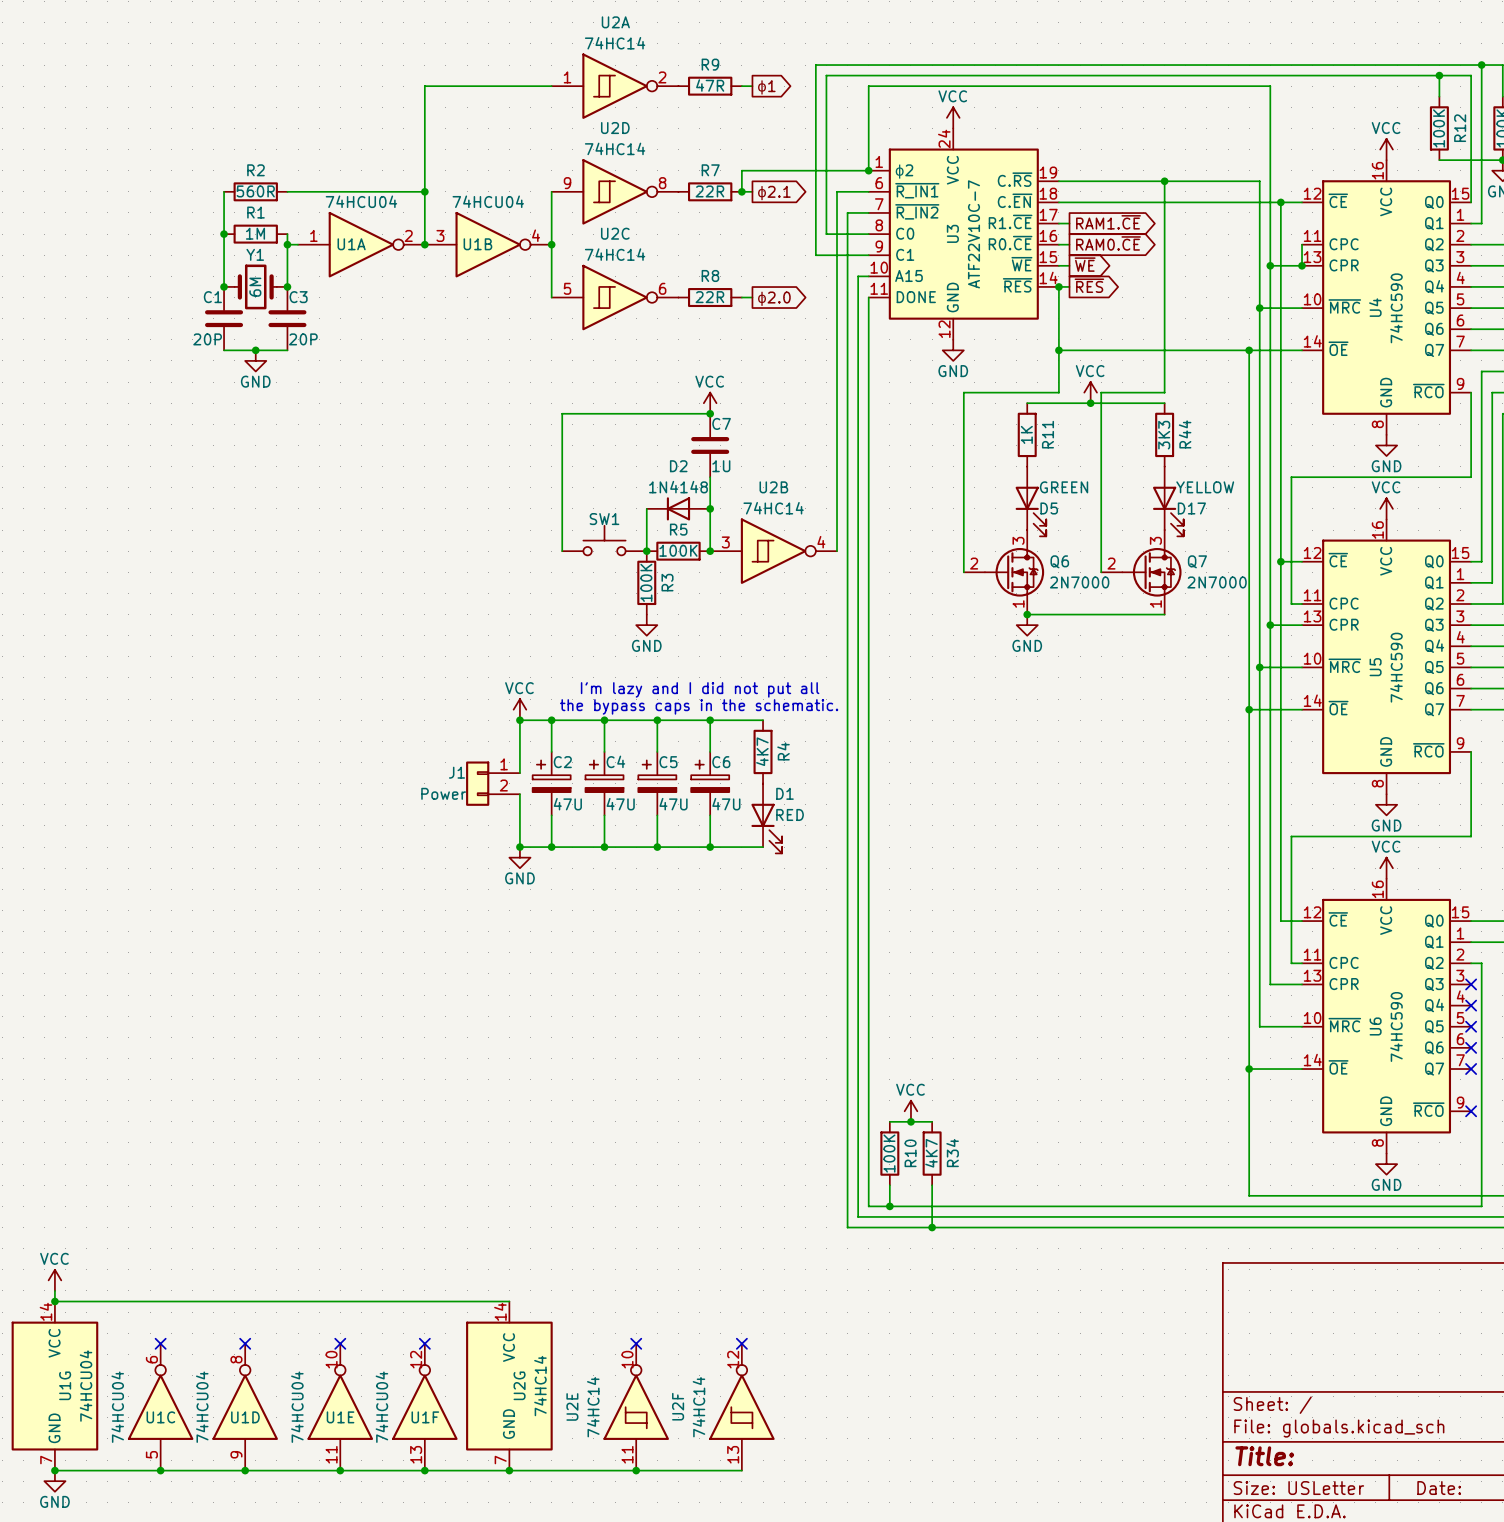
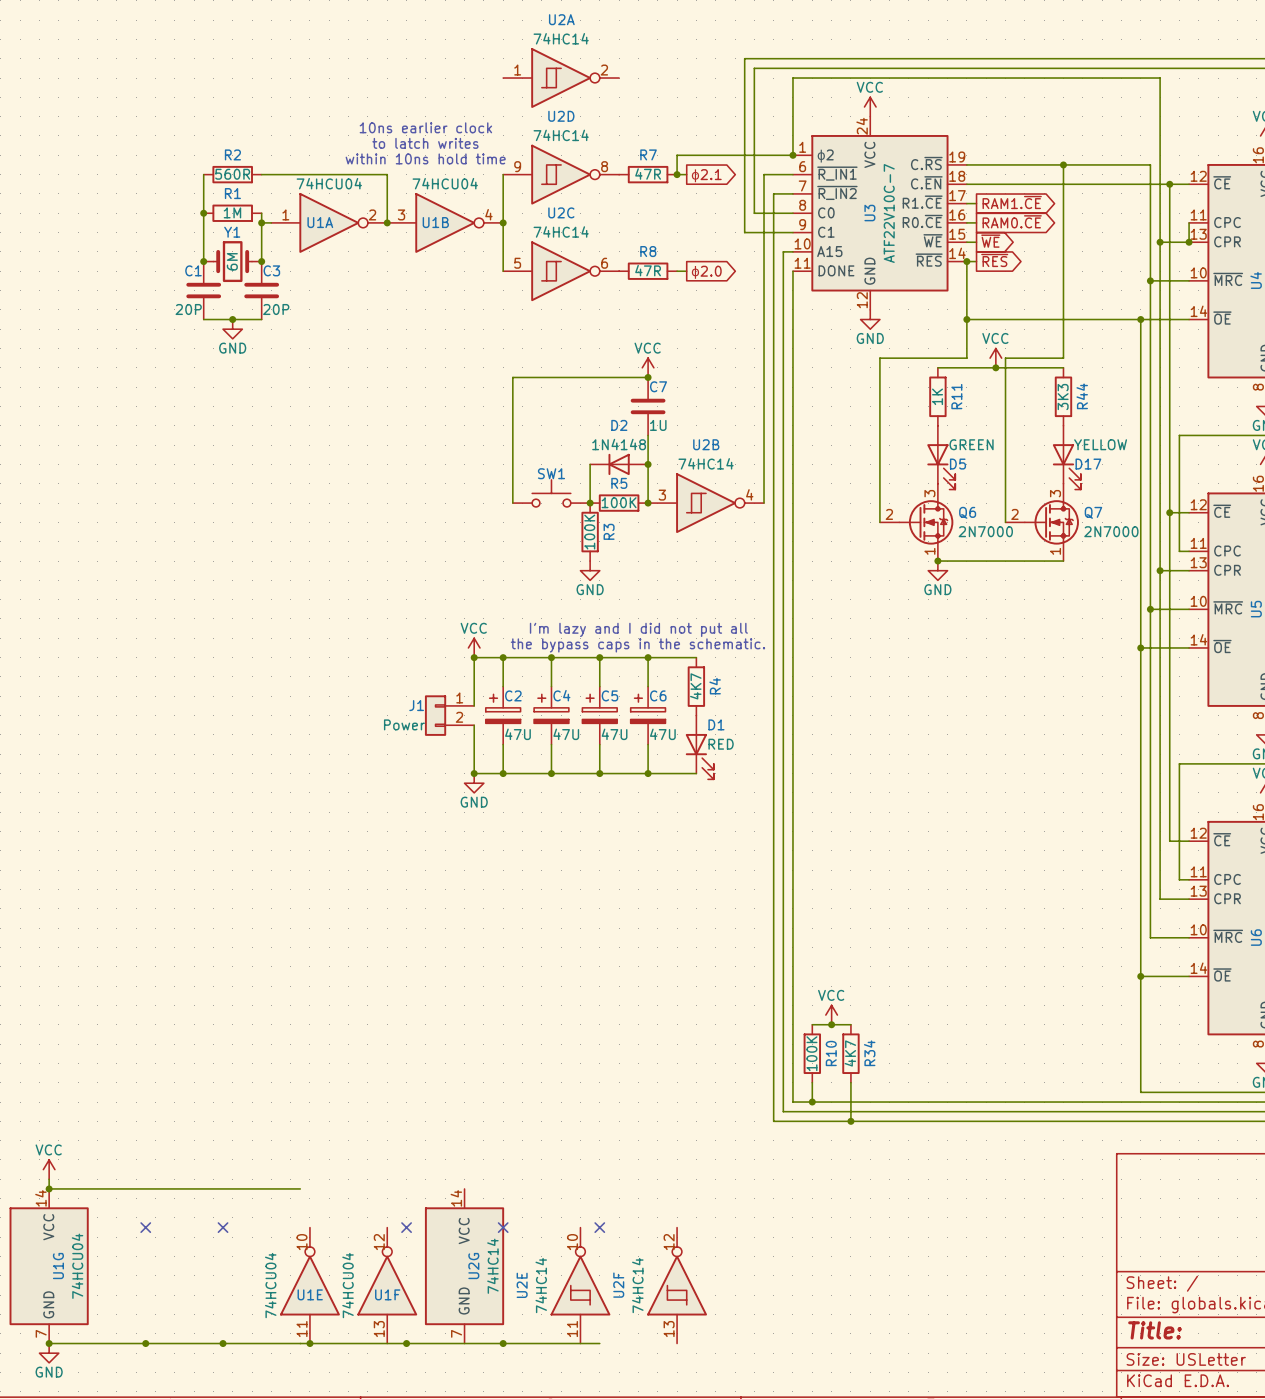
wire: (551, 86) (424, 86) (424, 191) -> none
R9: 47R (710, 86) -> none
wire: (741, 86) (752, 86) -> none
global label: ϕ1 (766, 87) -> none
text: none -> 10ns earlier clock (425, 127)
text: none -> to latch writes (425, 143)
text: none -> within 10ns hold time (425, 158)
junction: (424, 191) -> none
R7 value: 22R (709, 191) -> 47R (648, 174)
R8 value: 22R (709, 297) -> 47R (648, 270)
wire: (329, 1301) (509, 1301) -> none
no-connect mark: (340, 1343) -> none
no-connect mark position: (424, 1343) -> (406, 1227)
no-connect mark: none -> (503, 1227)
no-connect mark position: (636, 1343) -> (599, 1227)
no-connect mark: (741, 1343) -> none
U1C: 74HCU04 (160, 1407) -> none
U1D: 74HCU04 (245, 1407) -> none
junction position: (424, 1470) -> (406, 1343)
junction: (509, 1470) -> none
junction: none -> (503, 1343)
junction: (636, 1470) -> none
wire: (657, 1470) (741, 1470) -> none

